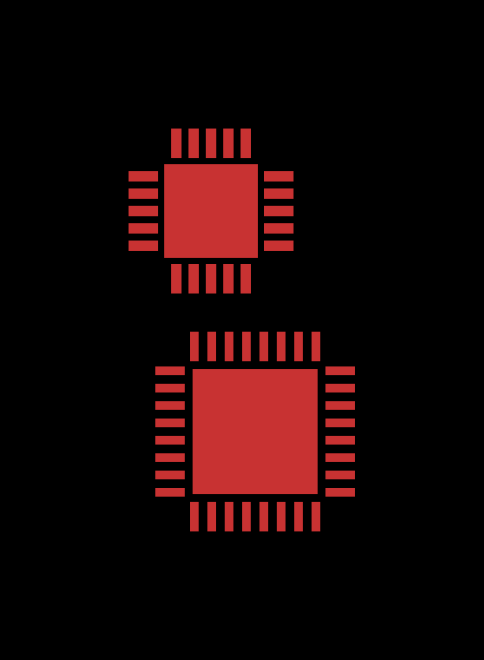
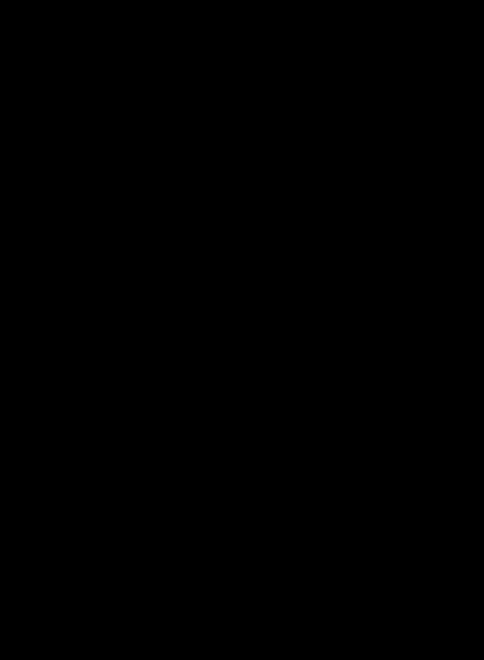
part: (211, 211) -> none
part: (255, 431) -> none

